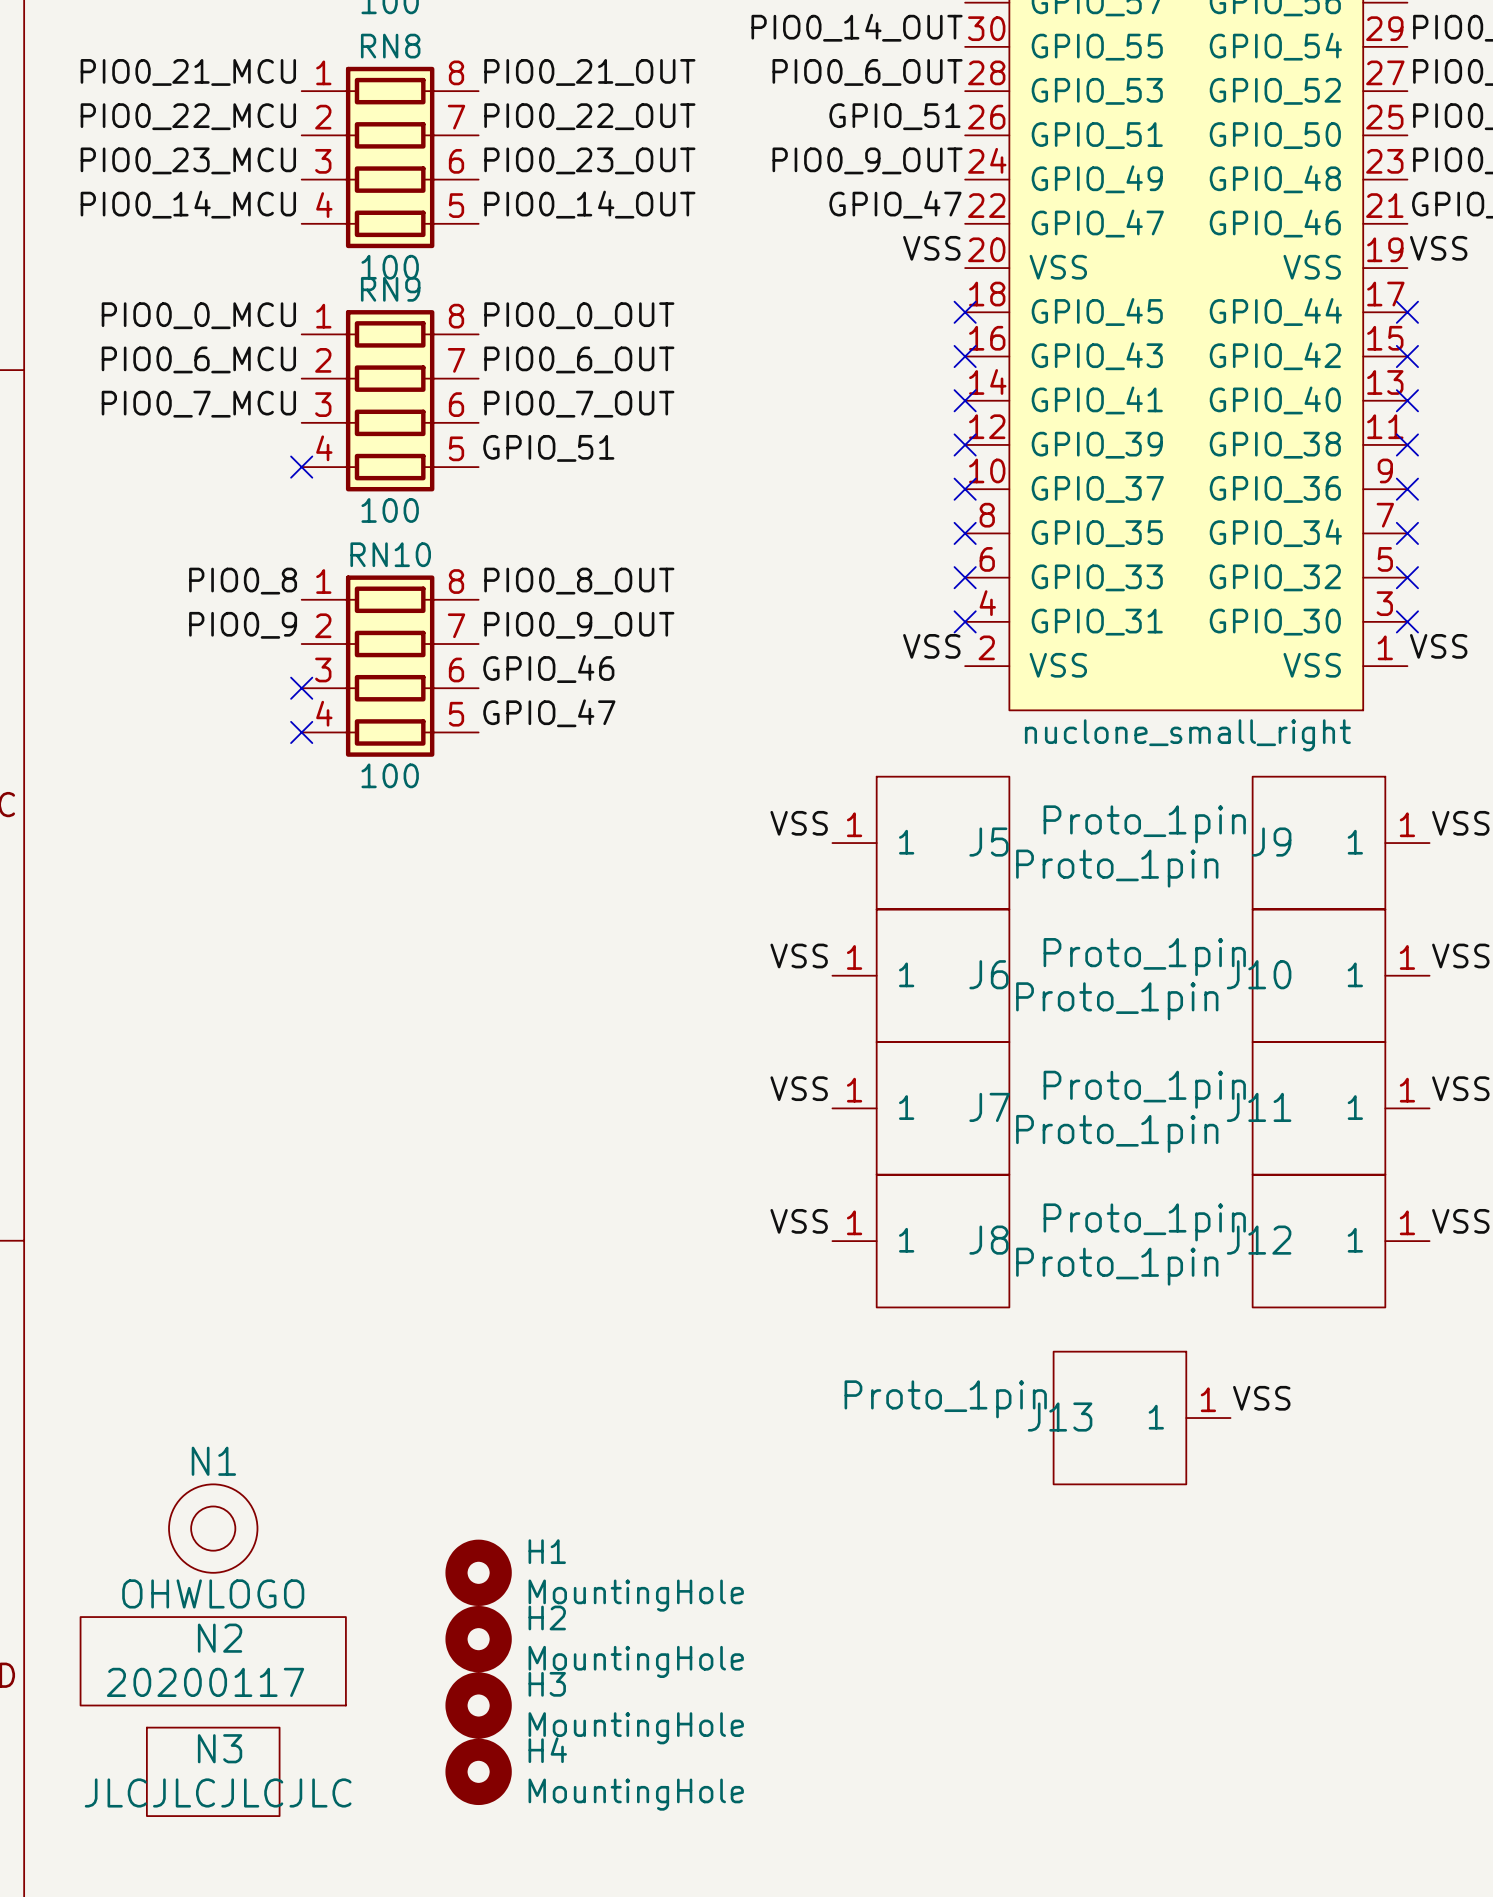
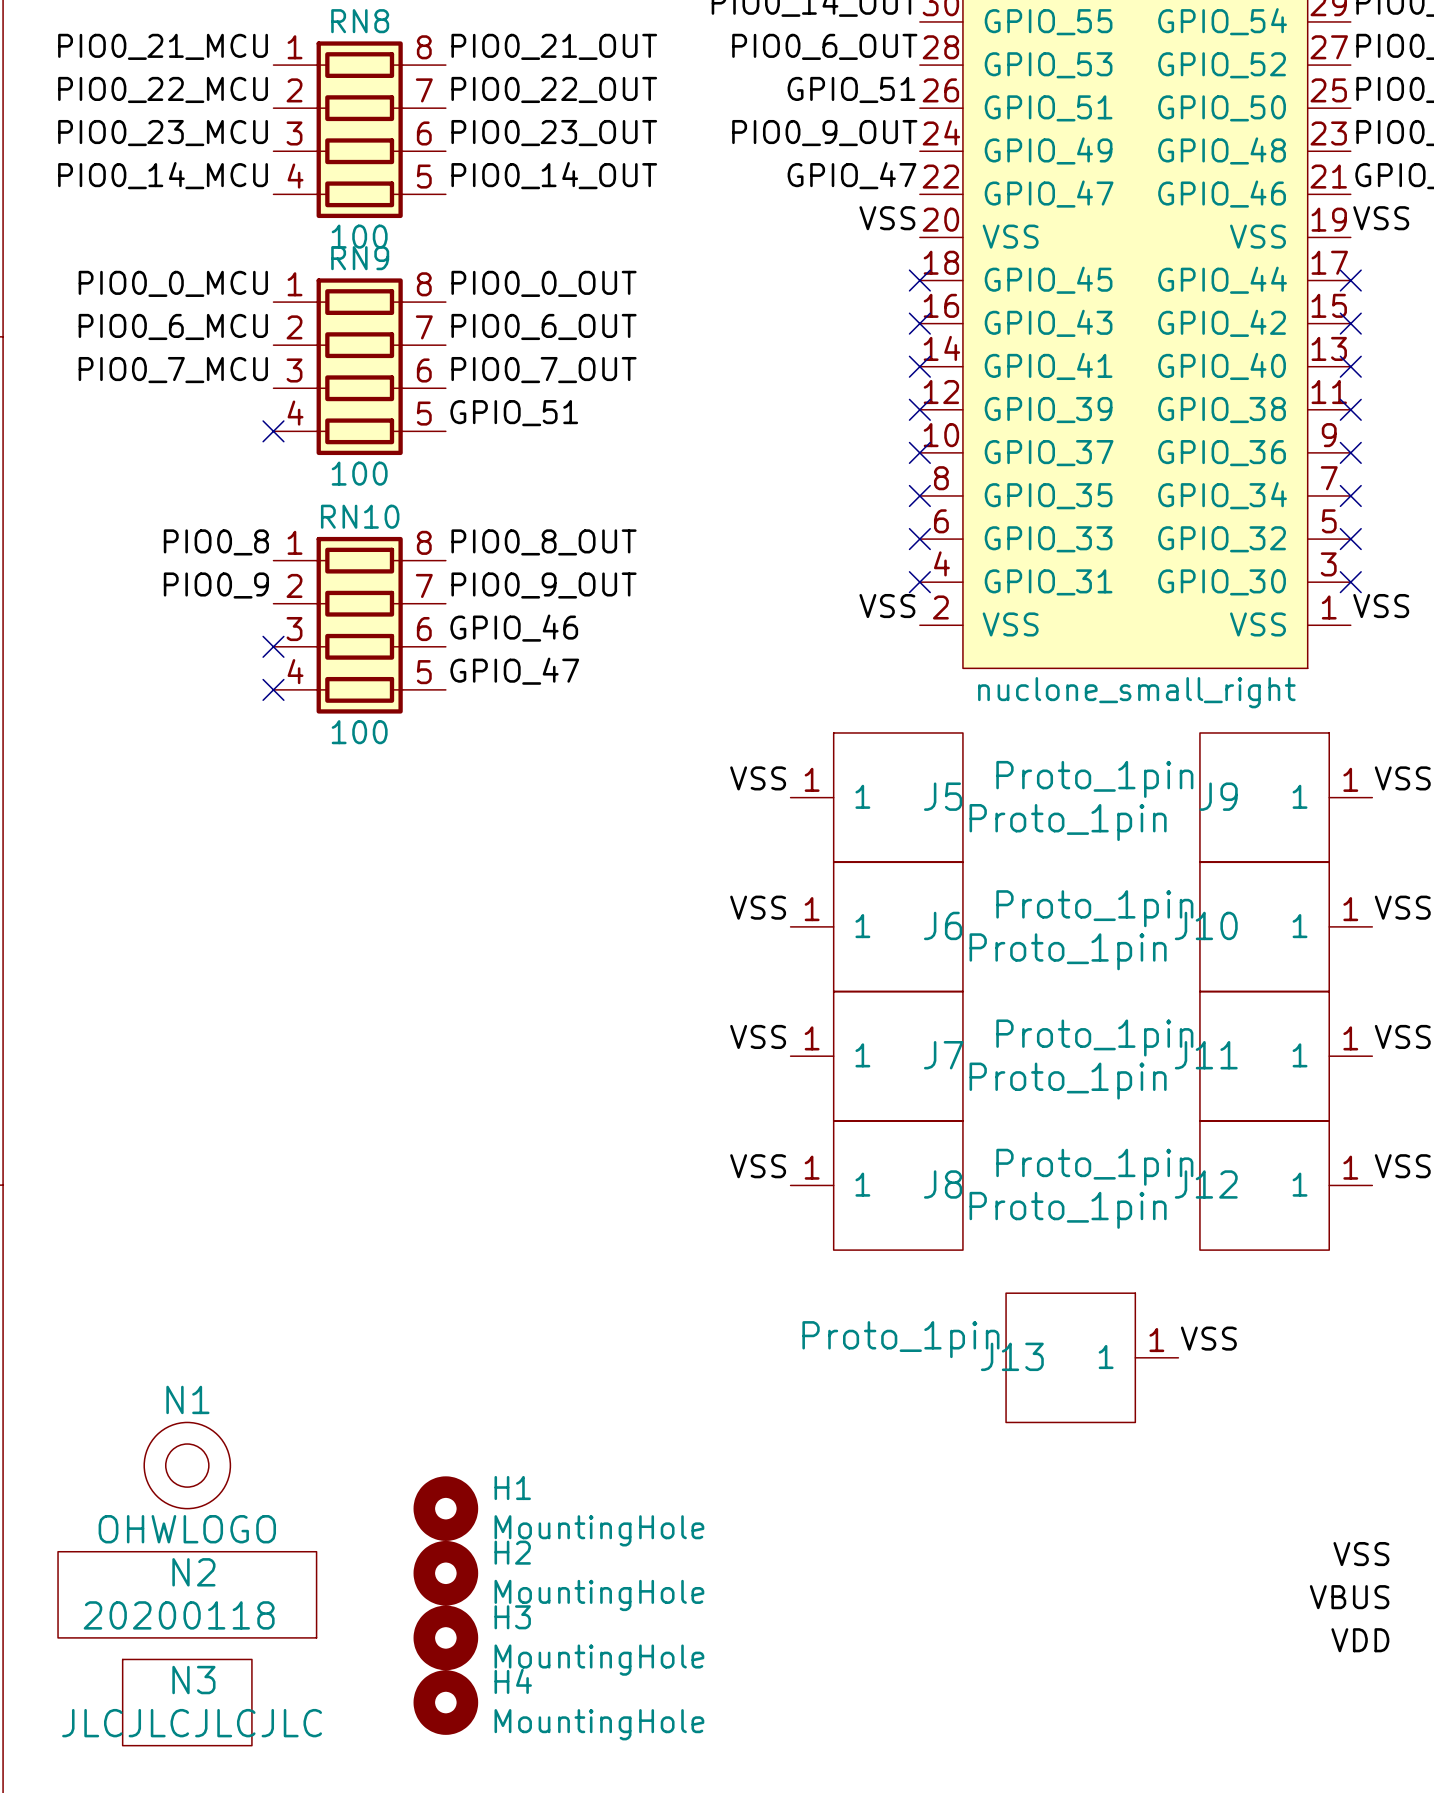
label: none -> VSS (1361, 1554)
label: none -> VBUS (1349, 1597)
N2 value: 20200117 (205, 1682) -> 20200118 (179, 1615)
label: none -> VDD (1360, 1640)

